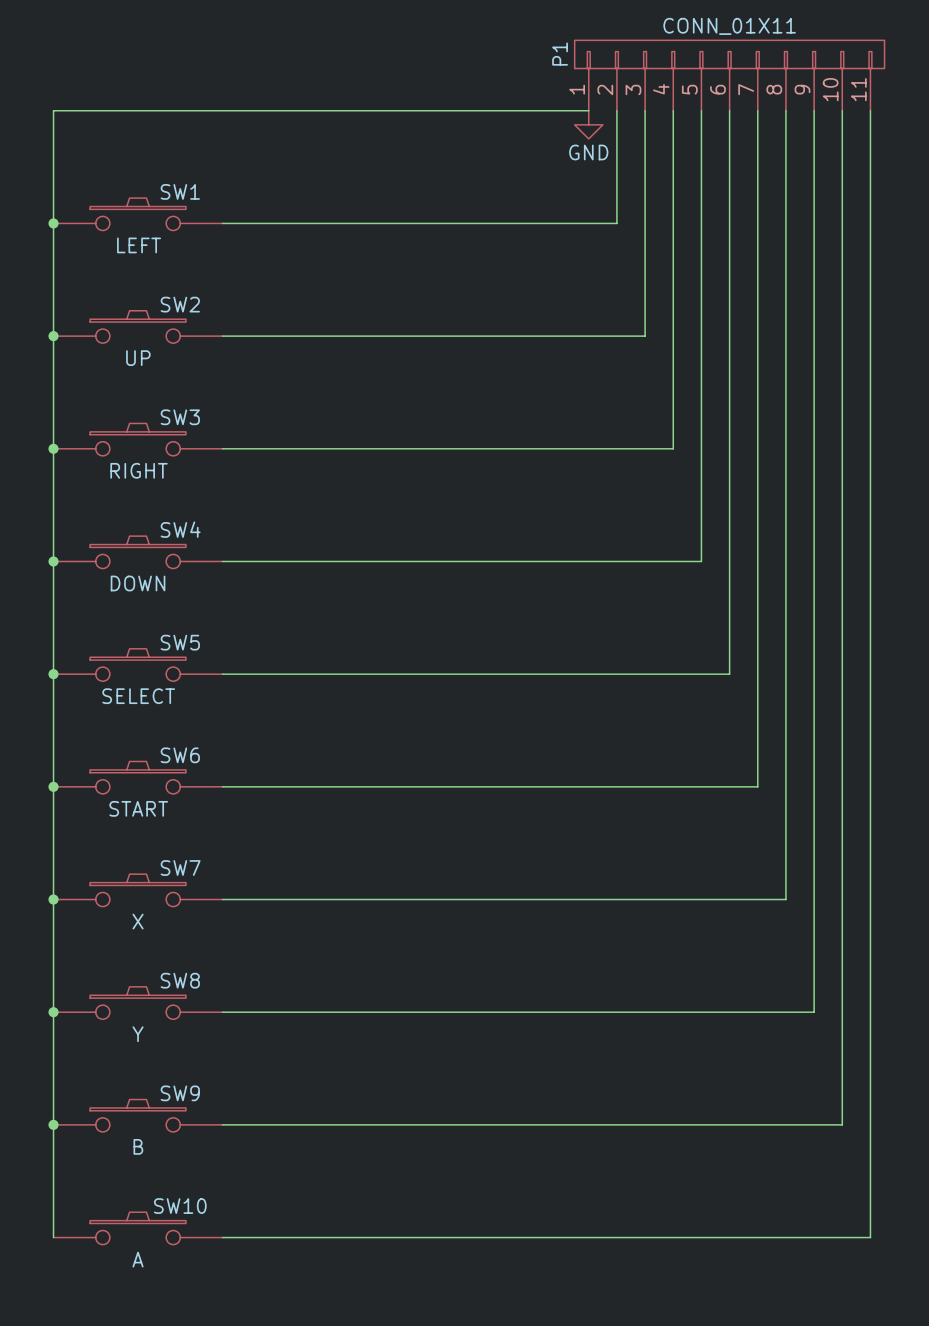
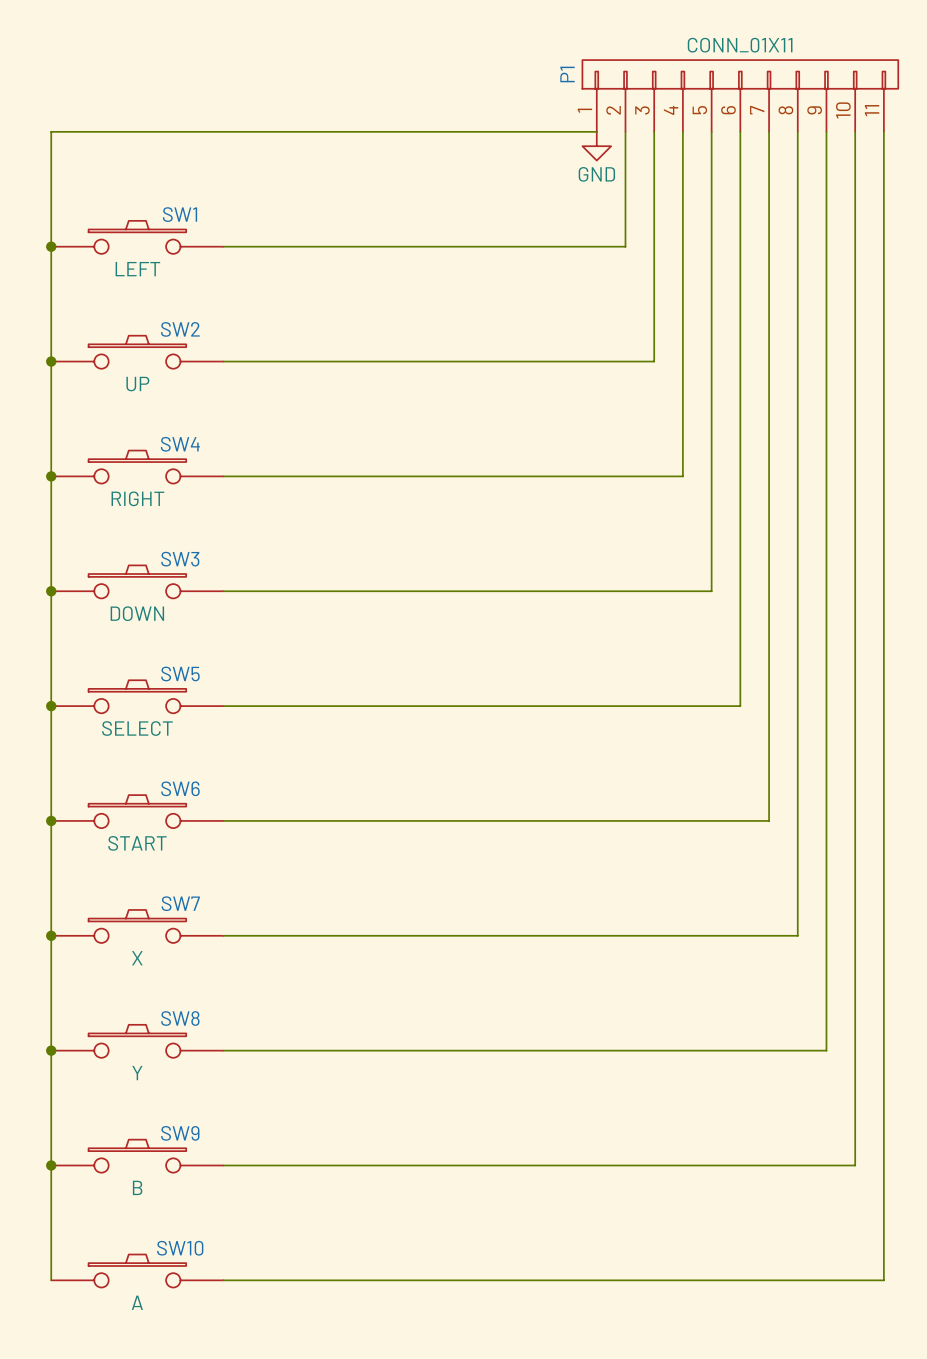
SW3 name: SW3 (180, 417) -> SW4 (180, 444)
SW4 name: SW4 (180, 529) -> SW3 (180, 559)

